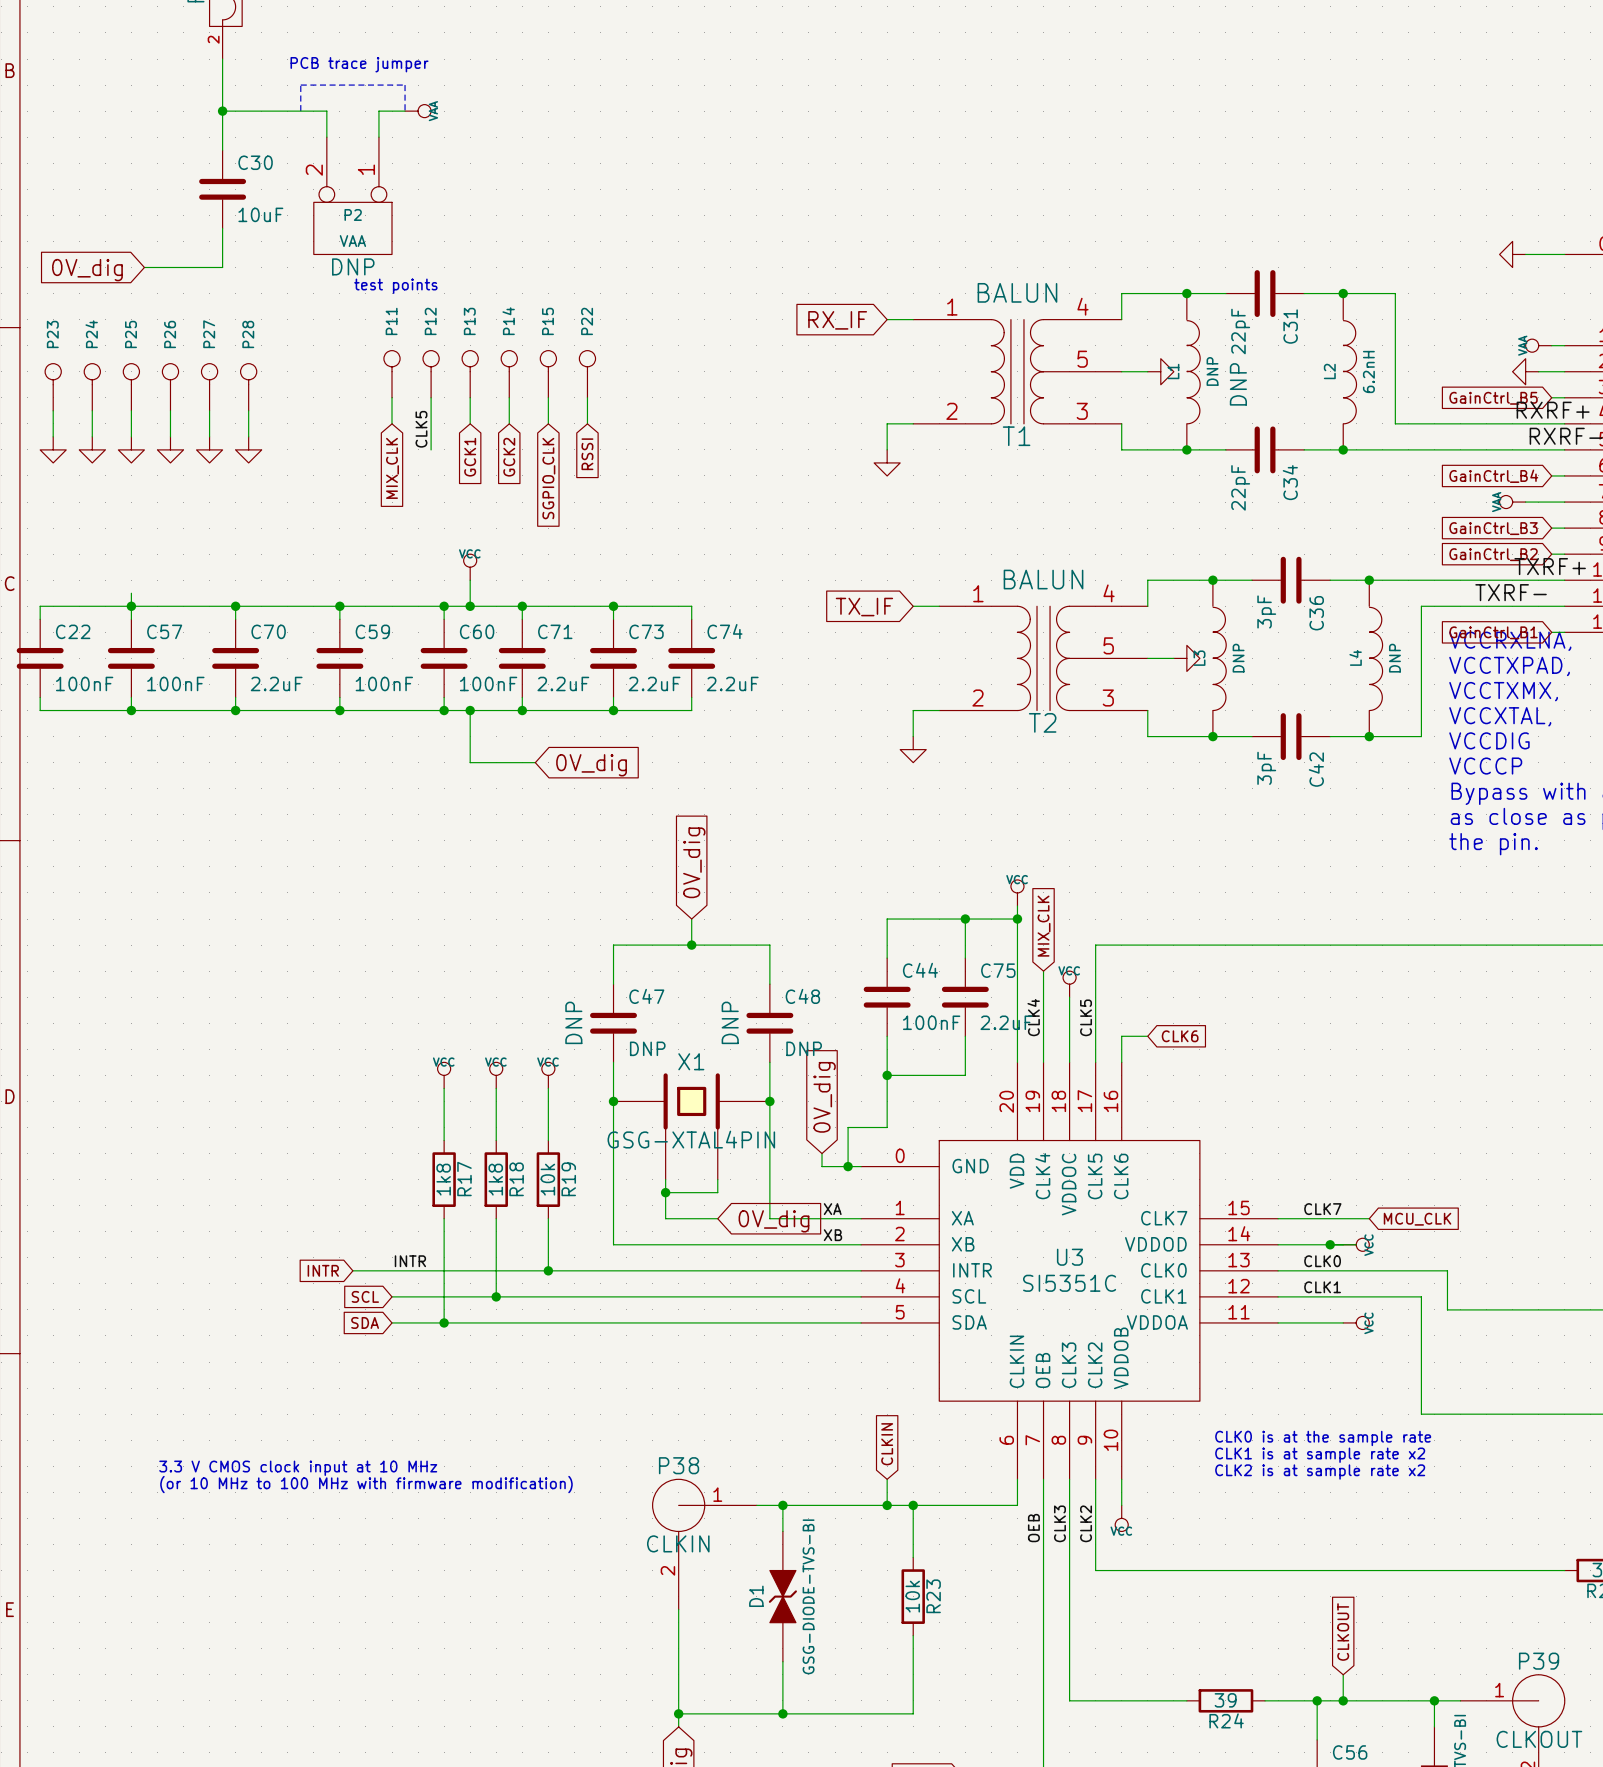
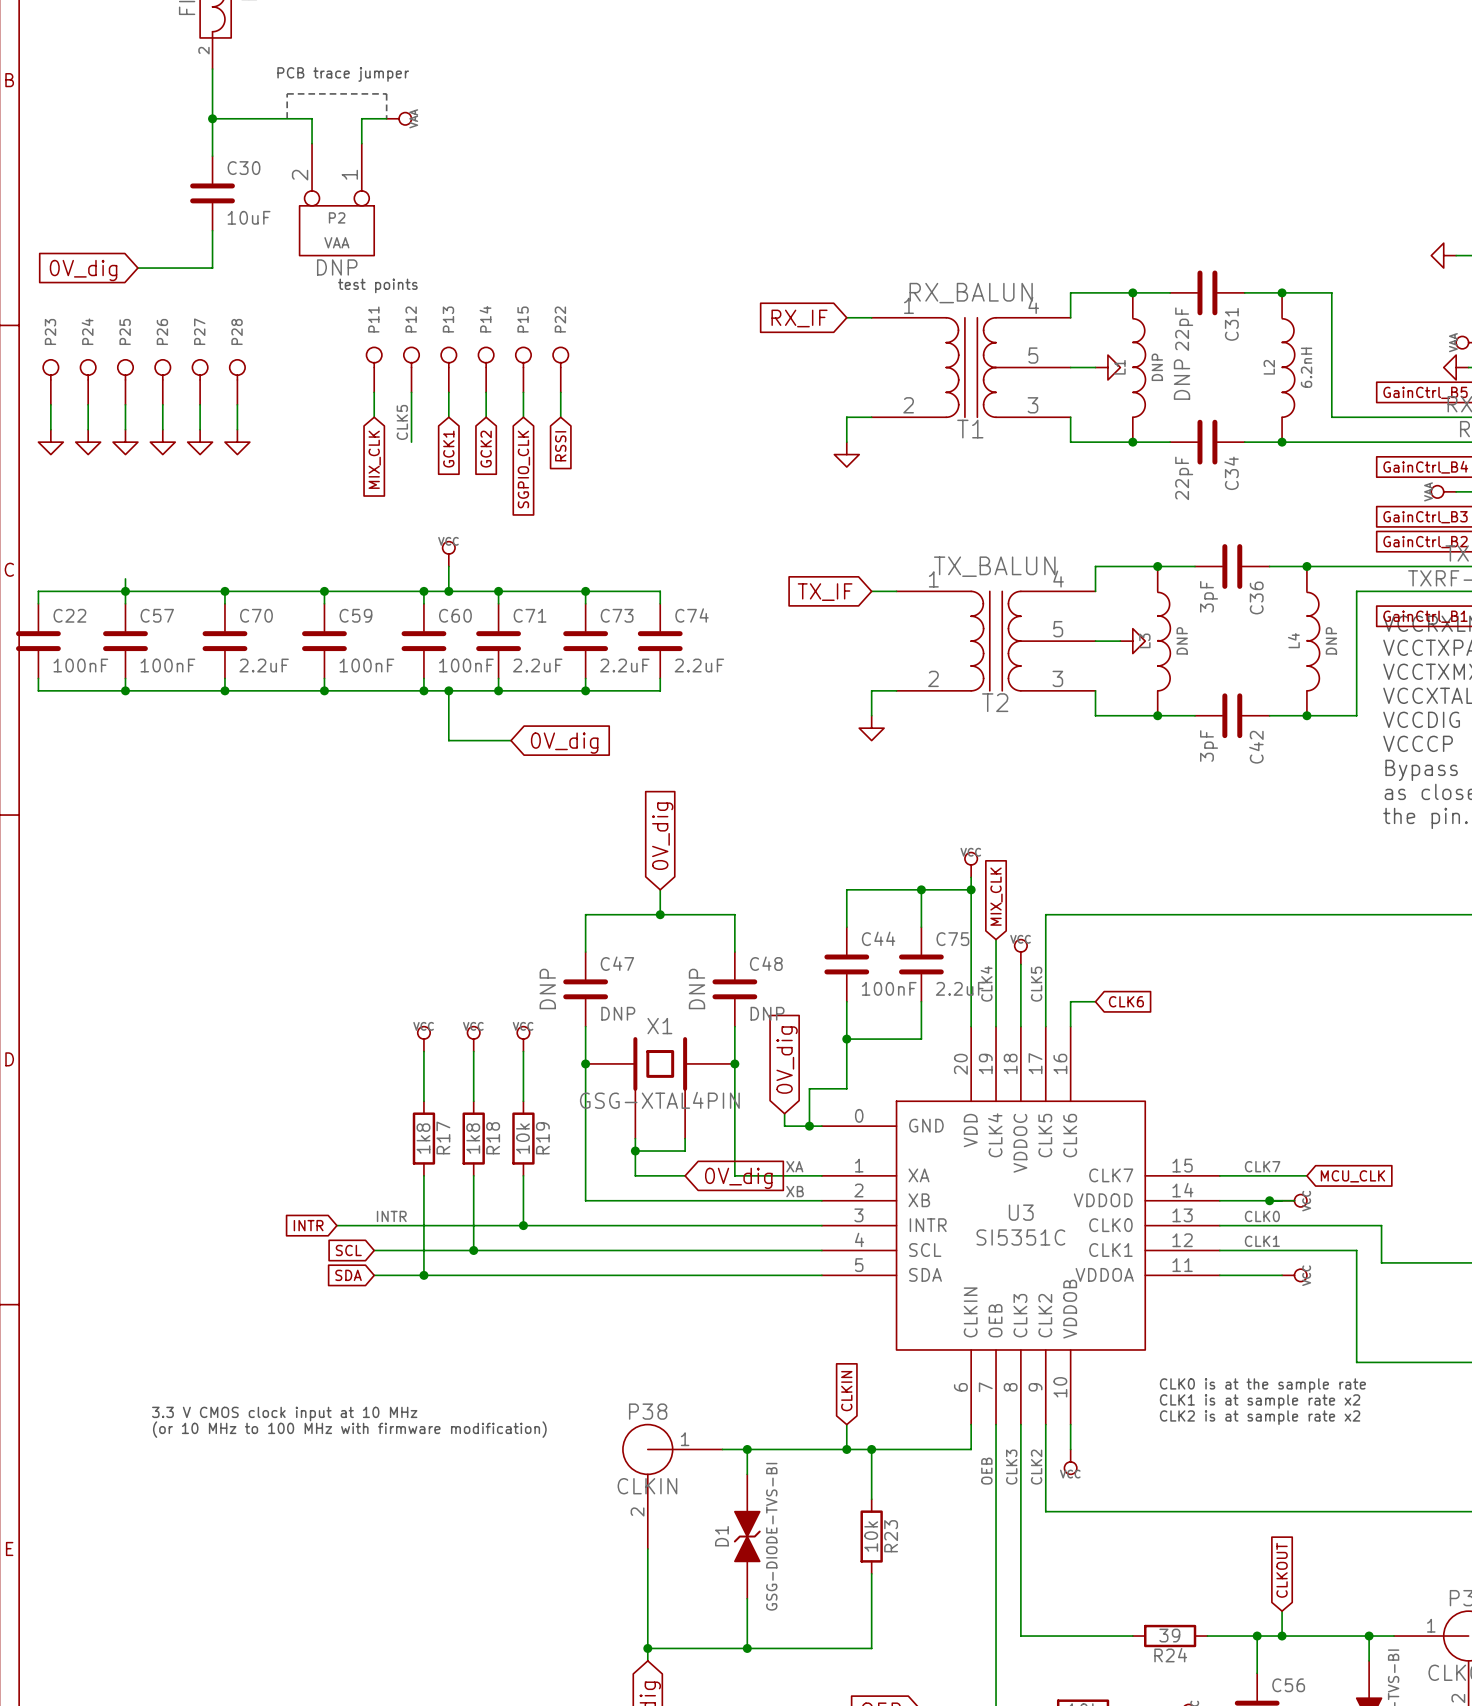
T1 value: BALUN (1017, 292) -> RX_BALUN (971, 293)
T2 value: BALUN (1043, 579) -> TX_BALUN (994, 566)

